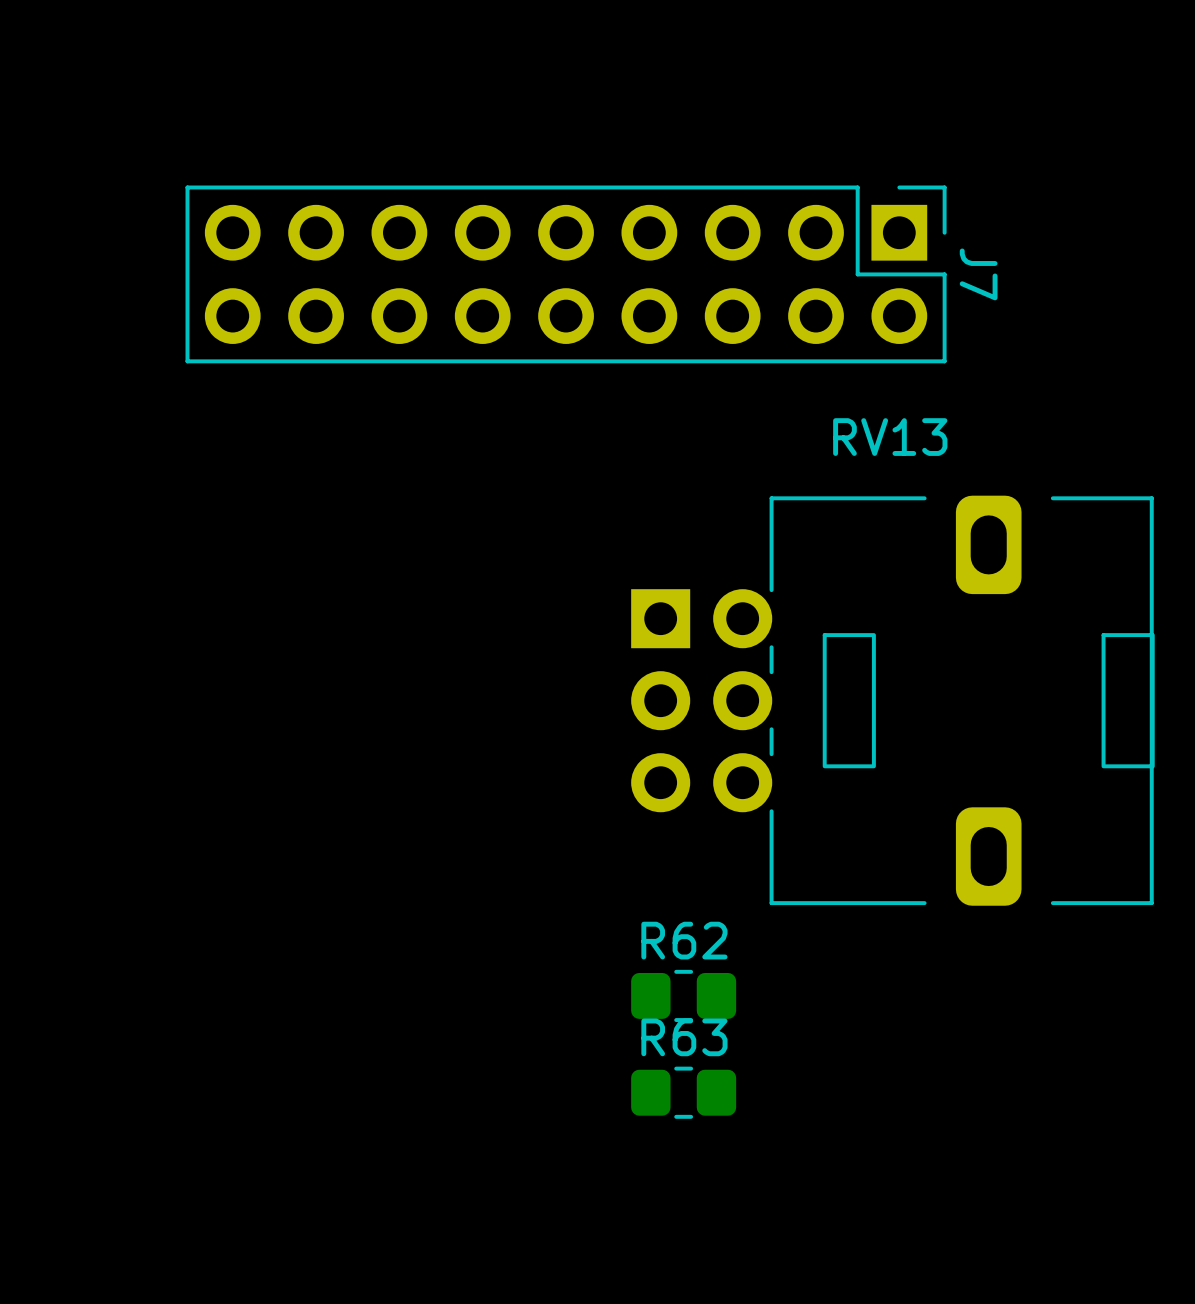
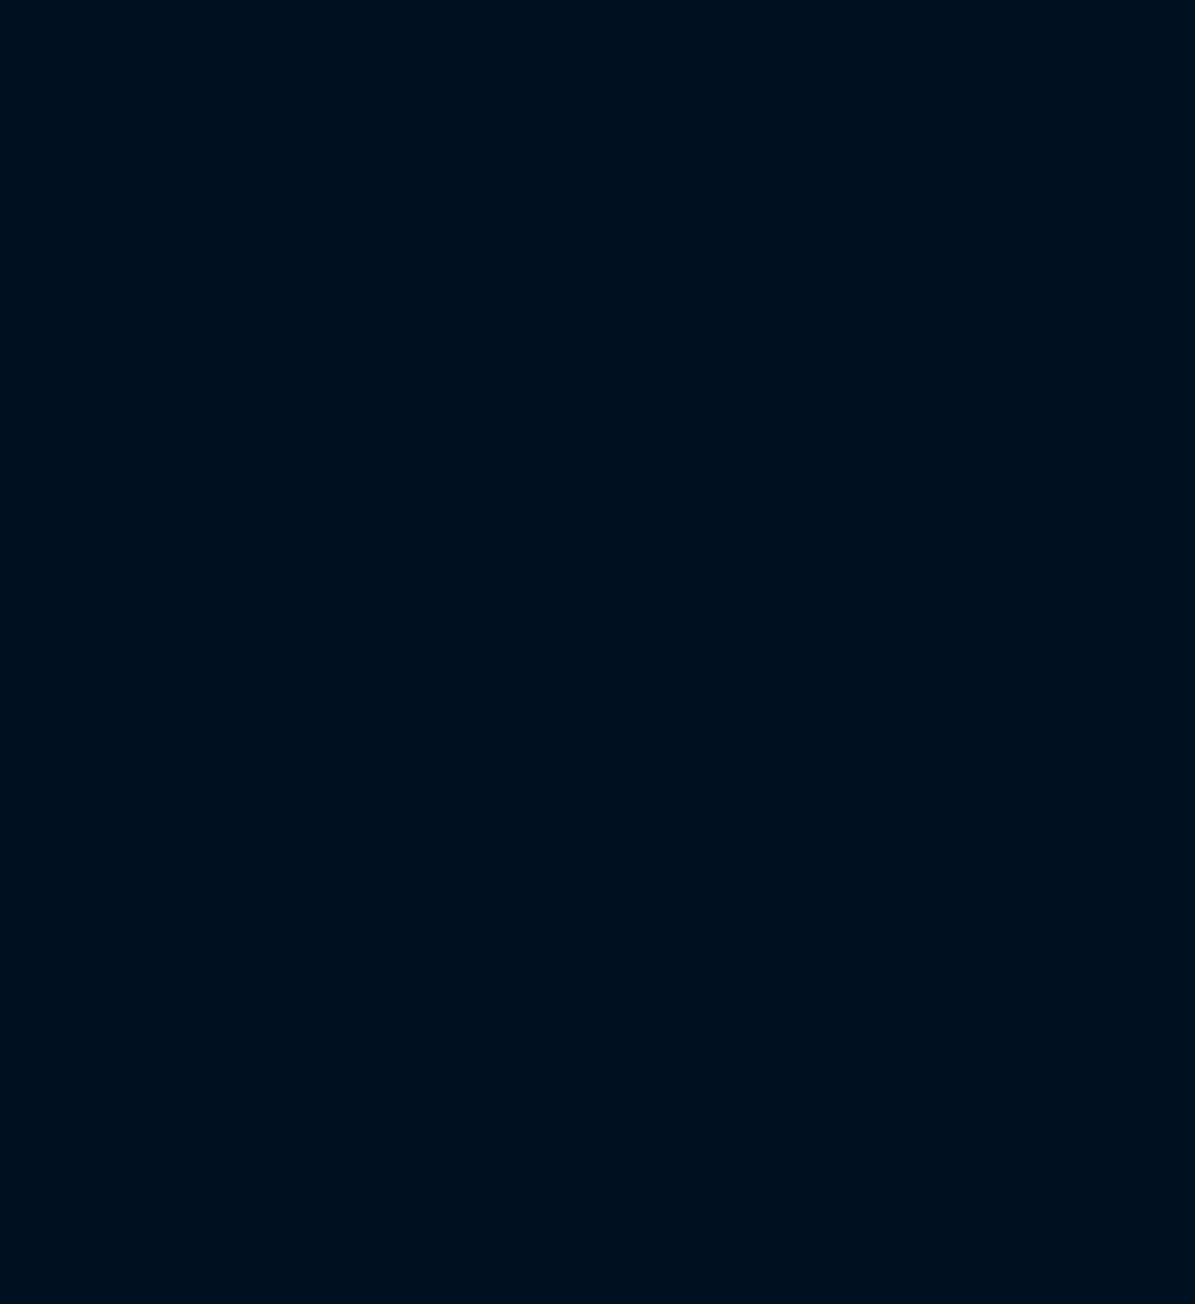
J7: (566, 274) -> none
RV13: (892, 700) -> none
R62: (683, 995) -> none
R63: (683, 1092) -> none

